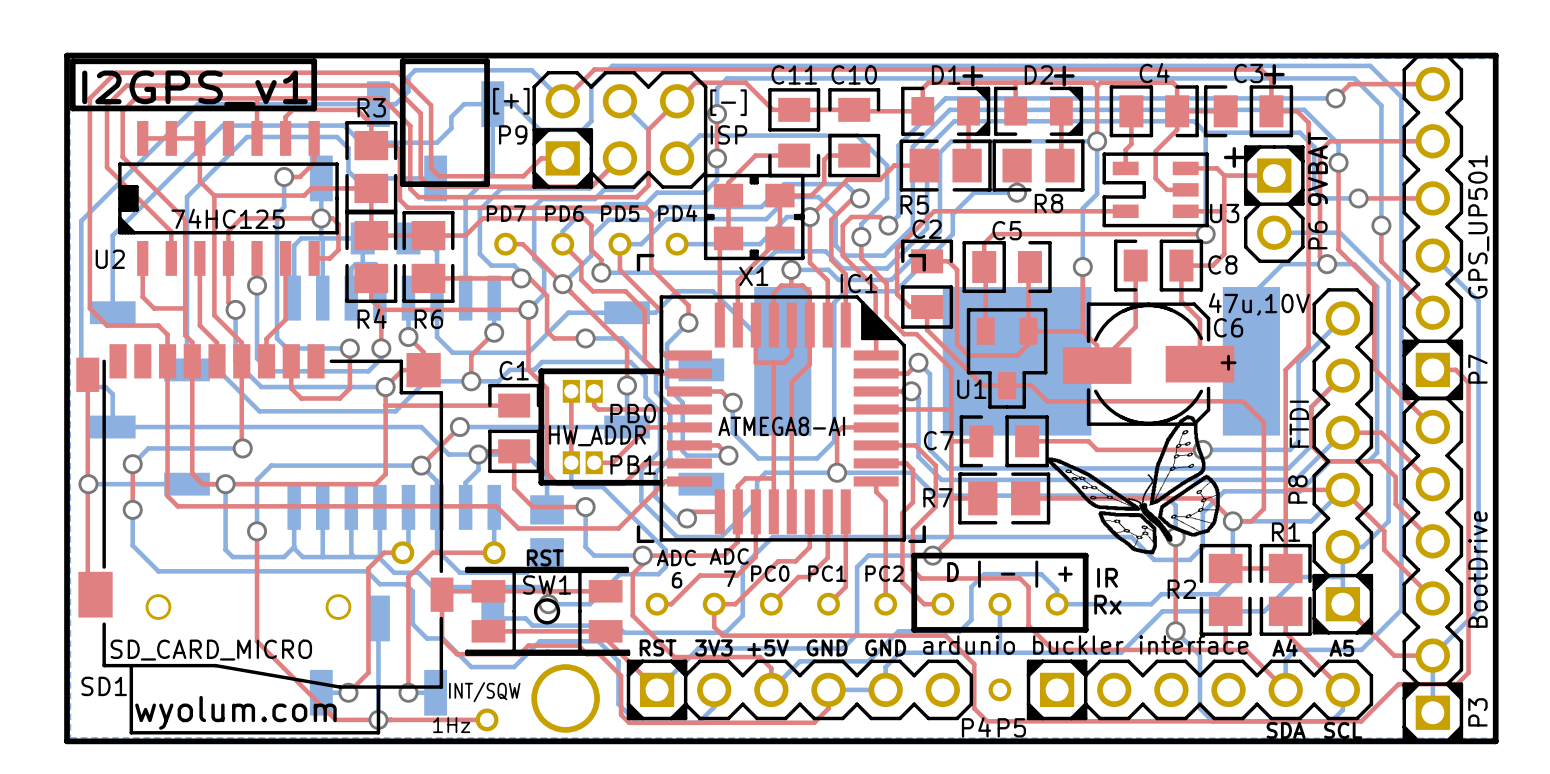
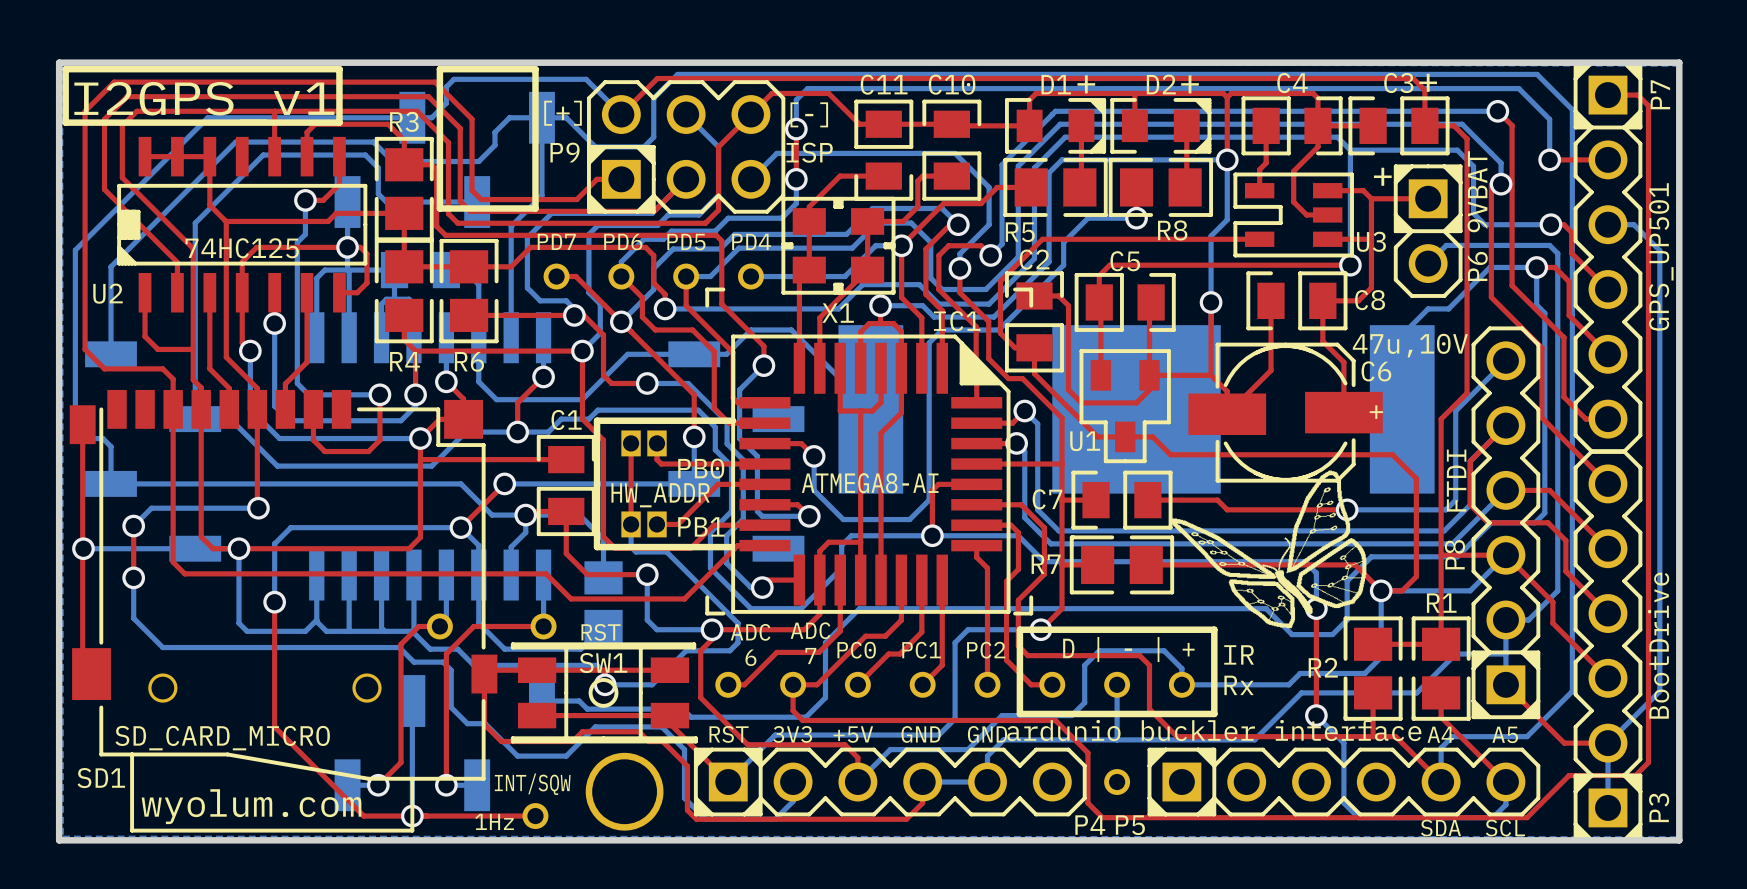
top track: (1432, 84) (1349, 84) (1335, 98) -> (1608, 419) (1585, 419) (1563, 397) (1563, 337) (1512, 285) (1512, 125) (1497, 111)
top track: (1381, 141) (1329, 141) (1319, 151) (1319, 257) (1327, 264) -> none
bottom track: (1381, 141) (1381, 225) -> none
via: none -> (1549, 159)
top track: (1338, 162) (1338, 249) (1374, 285) (1374, 368) -> (1491, 184) (1491, 297) (1541, 347) (1541, 417)
top track: (1358, 198) (1382, 198) -> none
bottom track: none -> (1523, 224) (1550, 224)
via: (1358, 198) -> none
via: none -> (1550, 224)
top track: (1393, 198) (1432, 198) -> (1563, 224) (1571, 232) (1571, 253) (1608, 289)
top track: (1381, 225) (1381, 261) (1398, 278) -> (1536, 267) (1554, 267) (1569, 281) (1569, 315)
via position: (1381, 225) -> (1536, 267)
P7 rotation: 0° (1432, 227) -> 180° (1608, 257)
bottom track: (1274, 232) (1339, 232) (1388, 281) -> (1428, 263) (1446, 245) (1549, 245) (1557, 253) (1557, 318)
bottom track: (1432, 255) (1478, 301) -> (1608, 224) (1633, 224) (1659, 250) (1659, 341)
via: (1327, 264) -> none
bottom track: (1274, 272) (1282, 264) (1354, 264) (1377, 287) -> (1428, 308) (1448, 308) (1490, 267) (1536, 267) (1536, 305) (1544, 313) (1544, 325)
top track: (1432, 369) (1455, 369) (1468, 382) -> (1608, 95) (1637, 95) (1648, 105) (1648, 433)
P7 name position: P7 (1477, 369) -> P7 (1660, 94)

